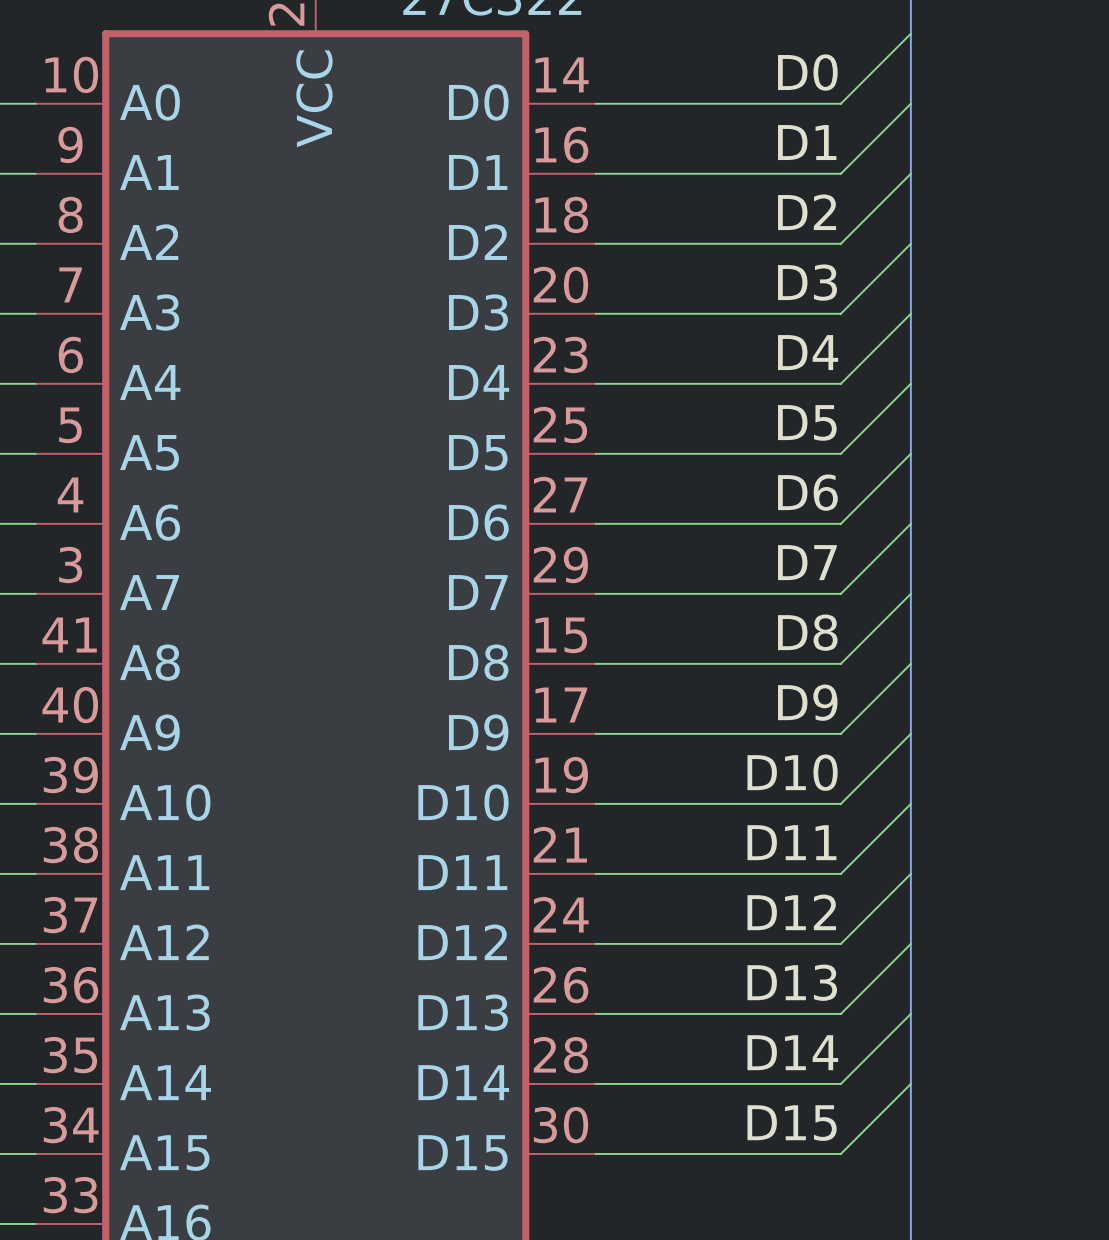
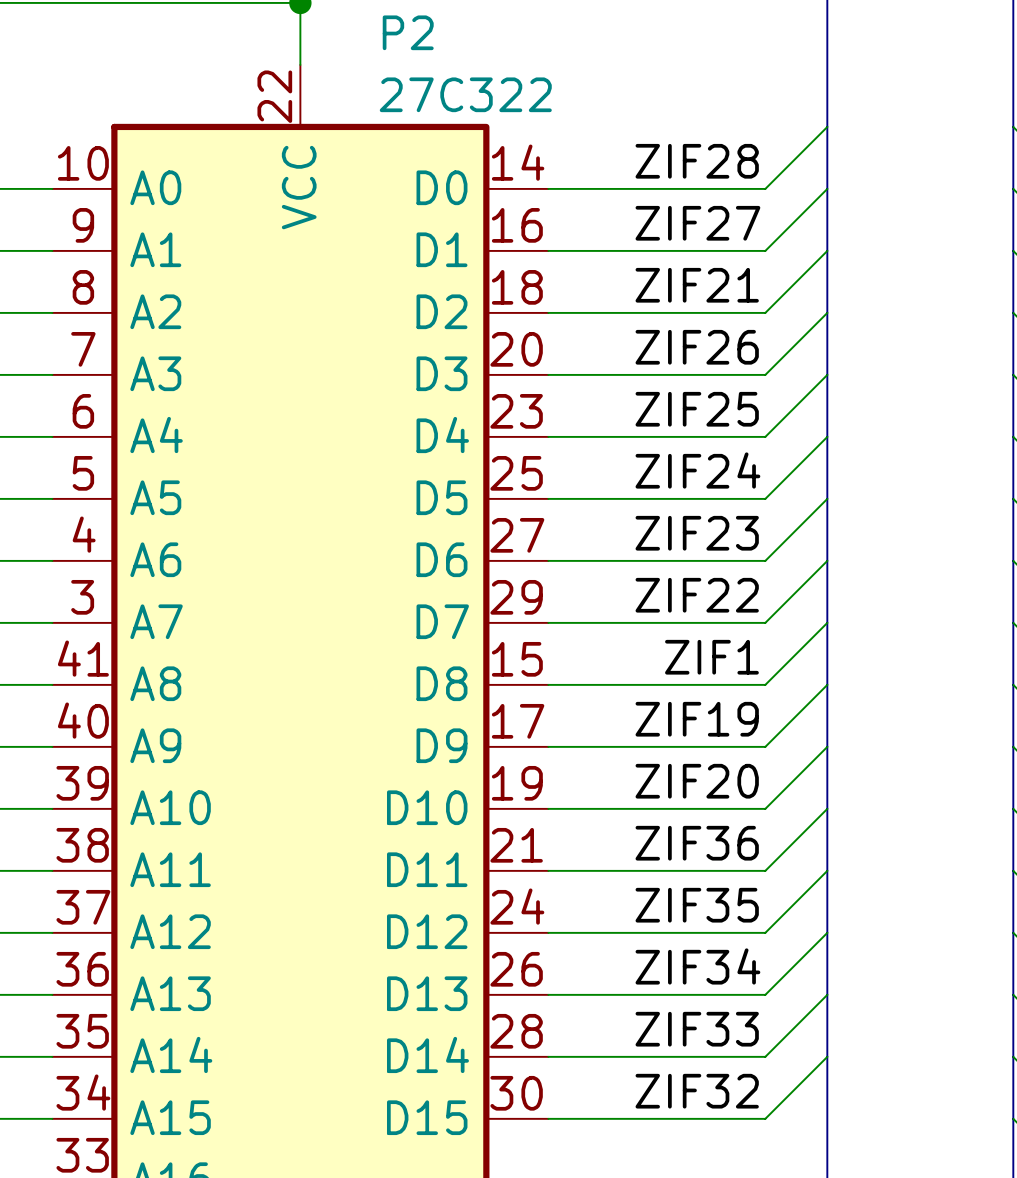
label: D0 (807, 72) -> ZIF28 (697, 161)
label: D1 (807, 142) -> ZIF27 (697, 223)
label: D2 (807, 212) -> ZIF21 (697, 285)
label: D3 (807, 282) -> ZIF26 (697, 347)
label: D4 (808, 352) -> ZIF25 (697, 409)
label: D5 (807, 422) -> ZIF24 (697, 470)
label: D6 (807, 492) -> ZIF23 (697, 533)
label: D7 (807, 562) -> ZIF22 (697, 595)
label: D8 (807, 632) -> ZIF1 (711, 657)
label: D9 (807, 702) -> ZIF19 (697, 719)
label: D10 (792, 772) -> ZIF20 (697, 781)
label: D11 (791, 842) -> ZIF36 (697, 843)
label: D12 (791, 912) -> ZIF35 (697, 905)
label: D13 (792, 982) -> ZIF34 (697, 966)
label: D14 (792, 1052) -> ZIF33 (697, 1029)
label: D15 (792, 1123) -> ZIF32 (697, 1091)

